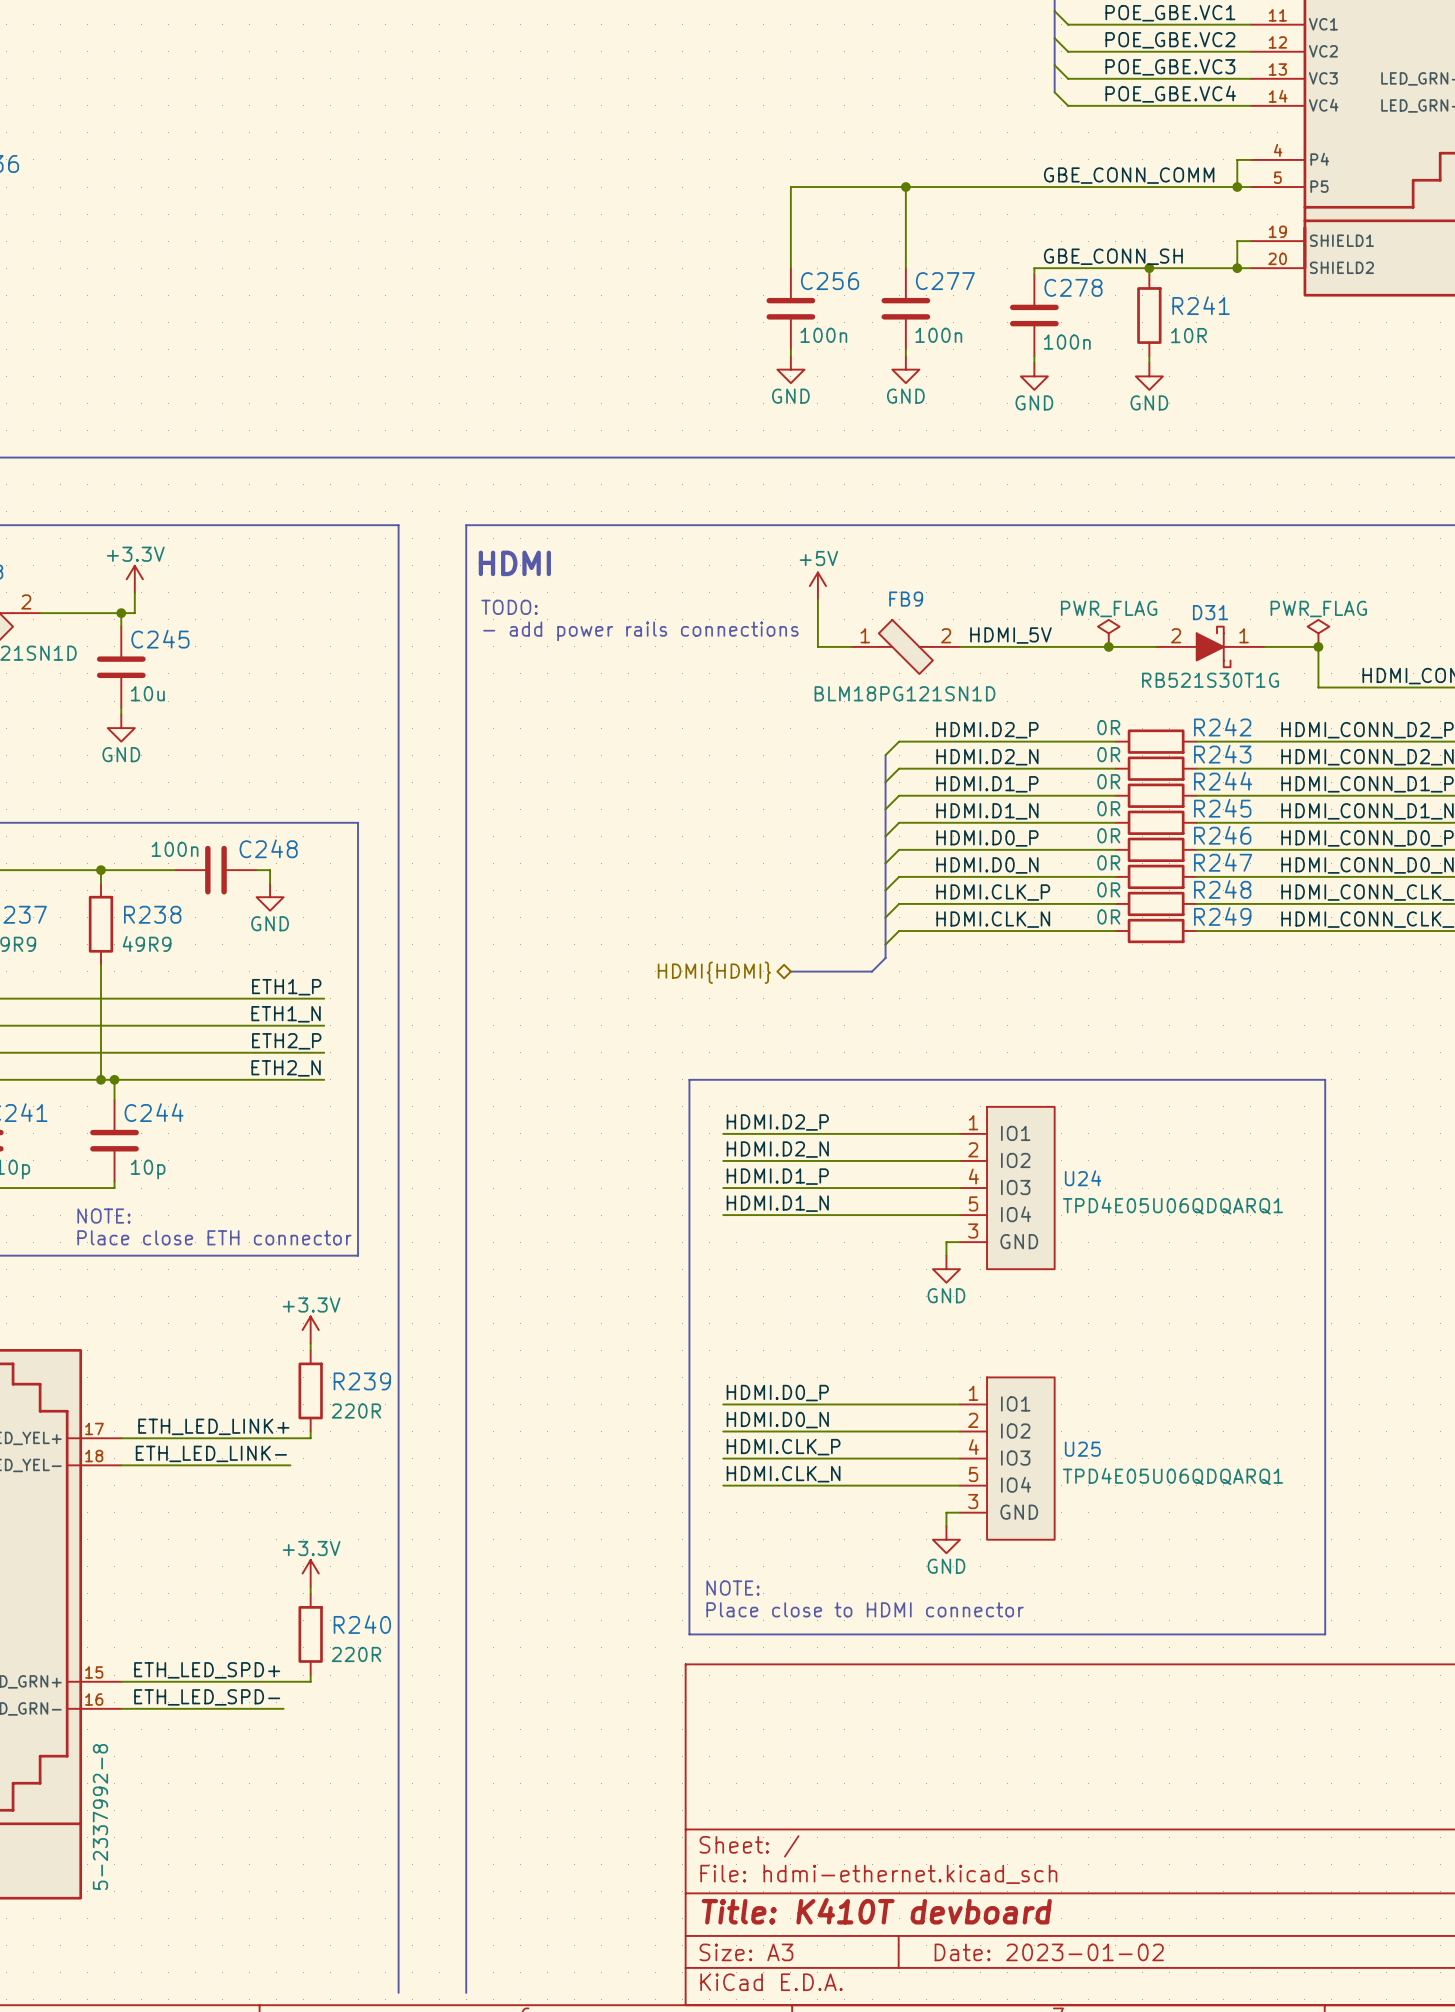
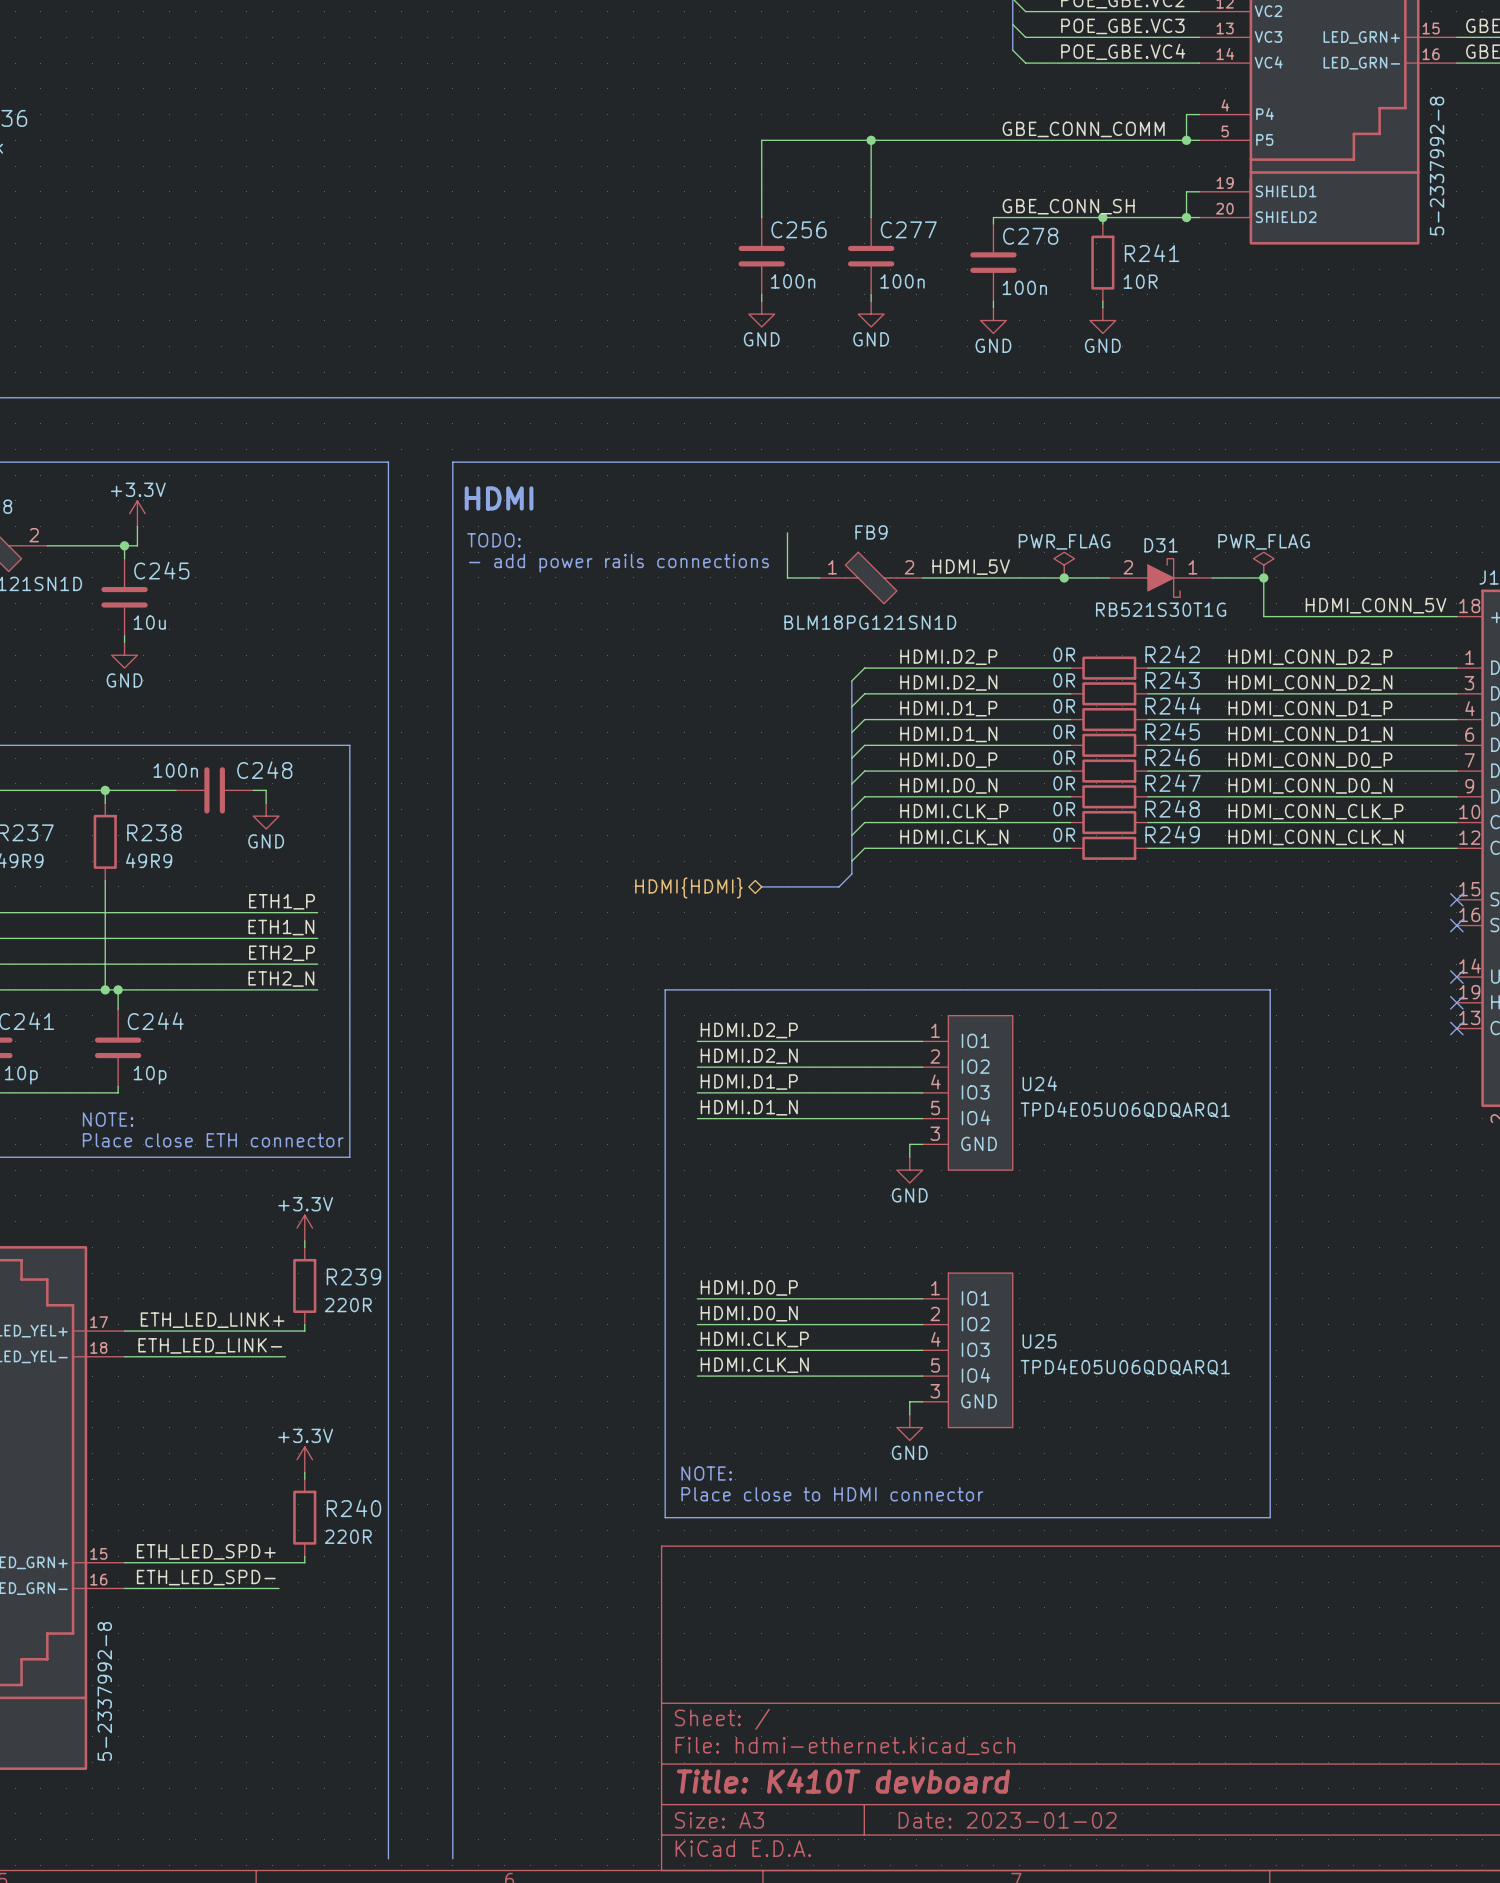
power symbol: +5V (817, 586) -> none

